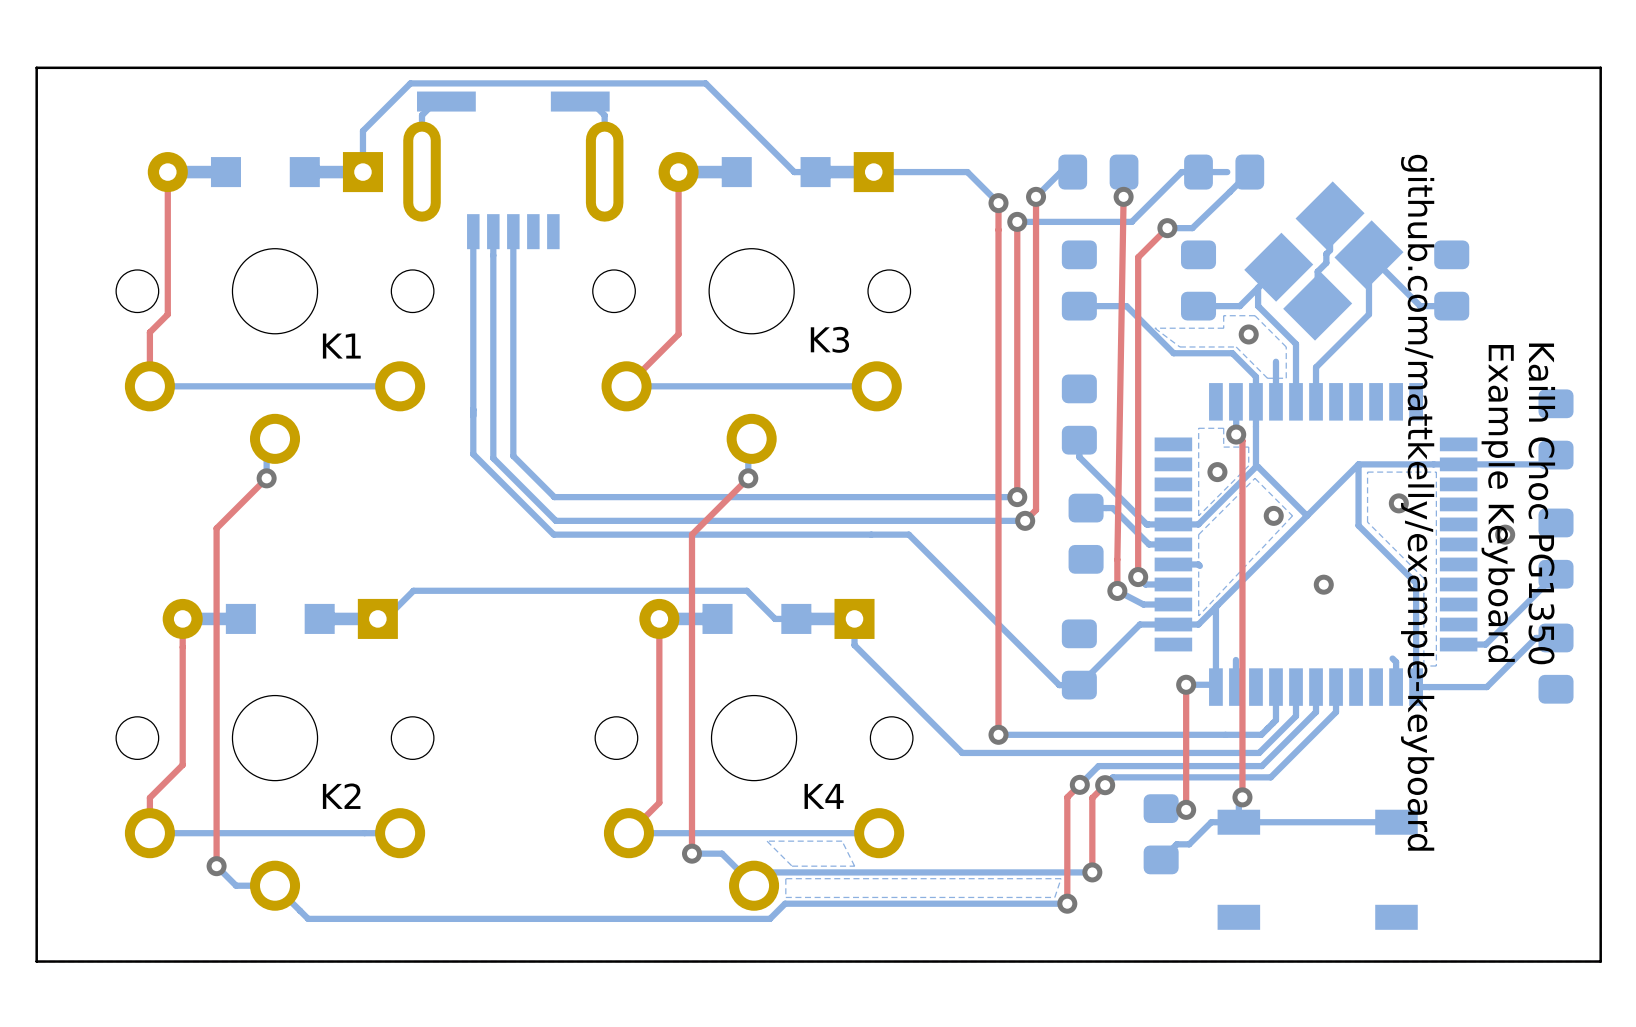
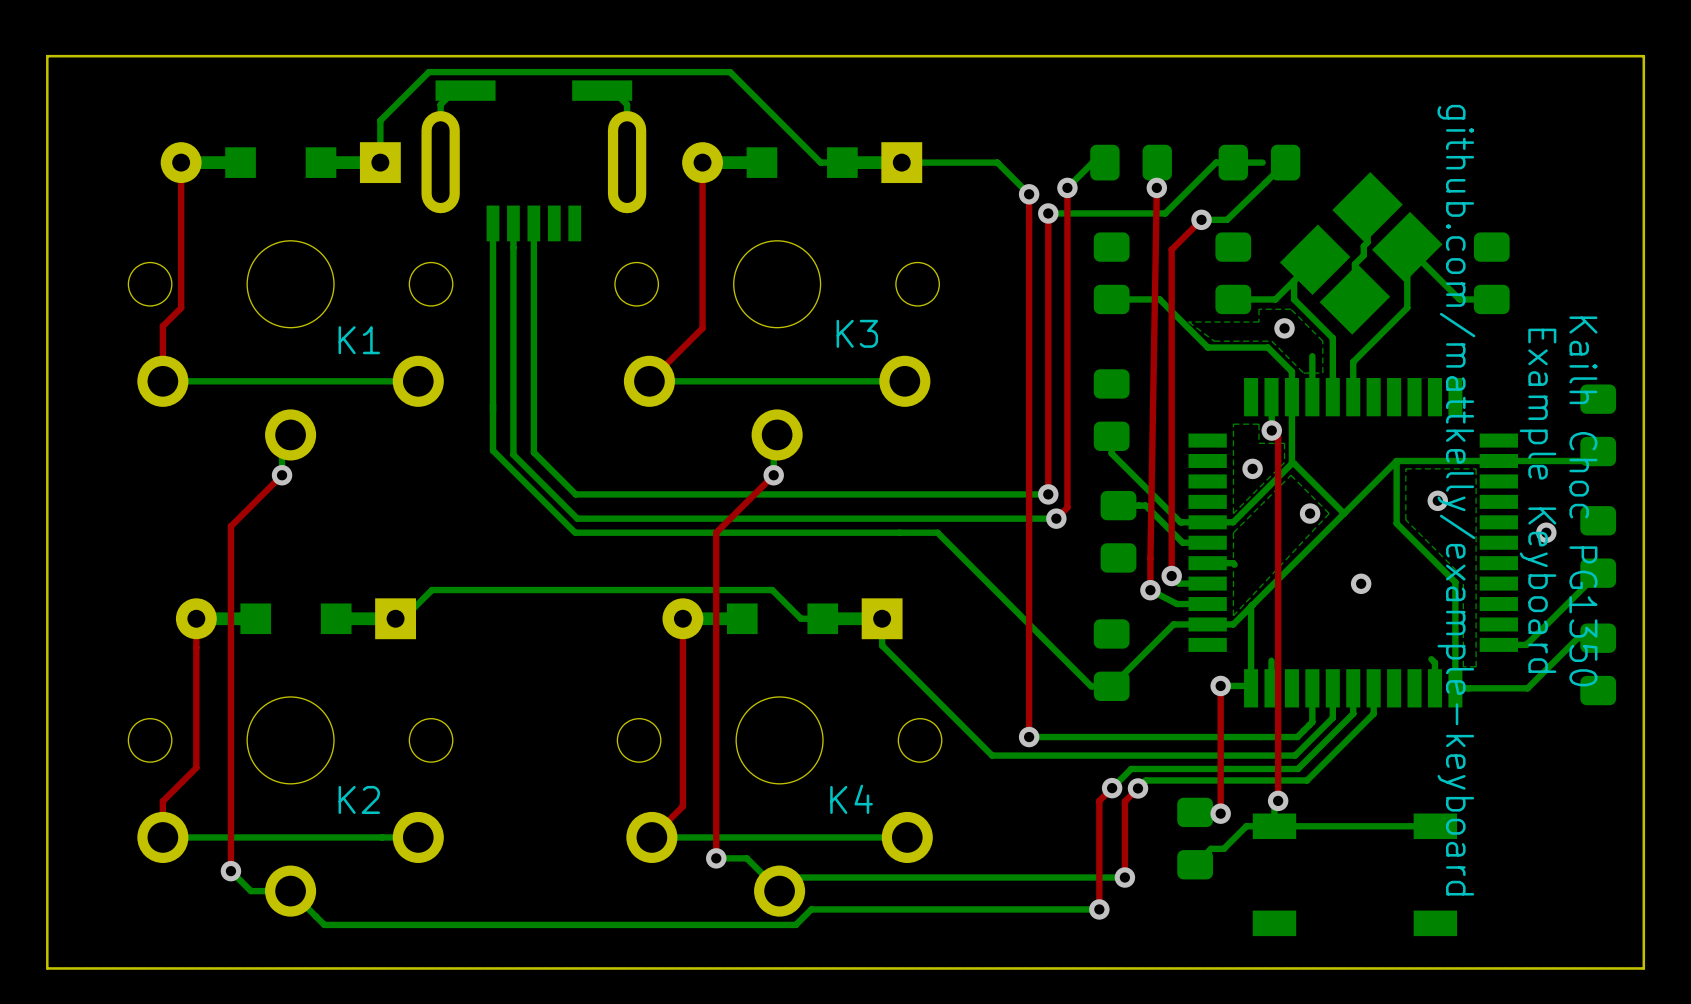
bottom zone outline: (767, 841) (792, 866) (854, 866) (842, 841) (767, 841) -> none
bottom zone outline: (785, 878) (785, 897) (1054, 897) (1061, 878) (785, 878) -> none

